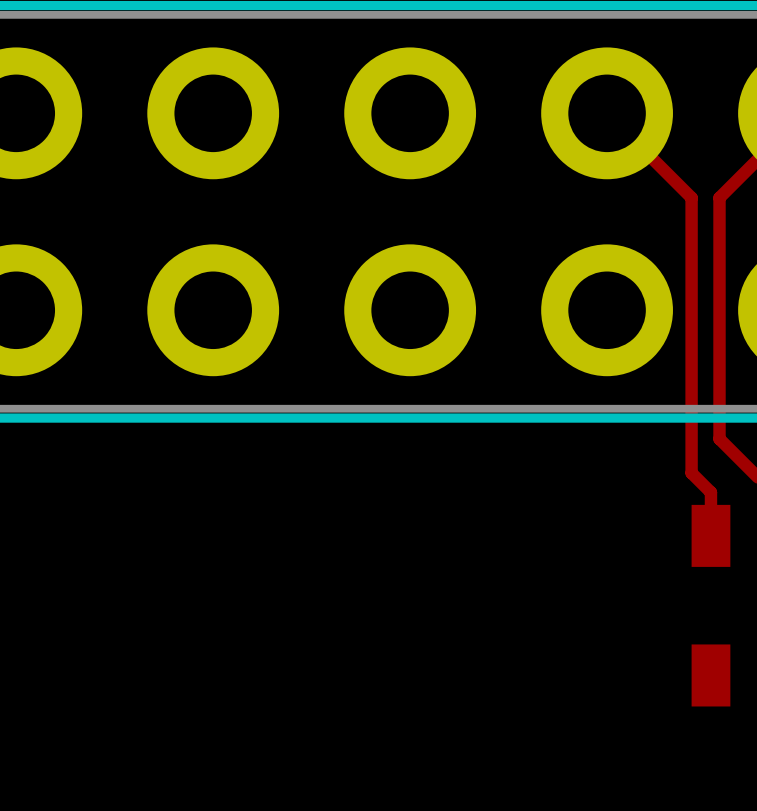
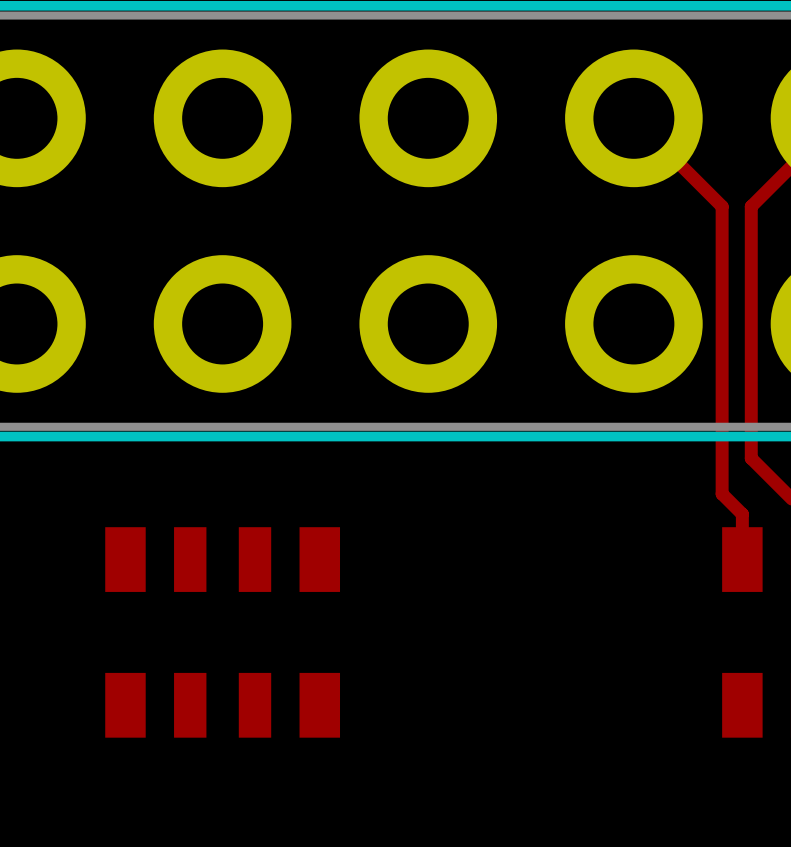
part: none -> (222, 632)

